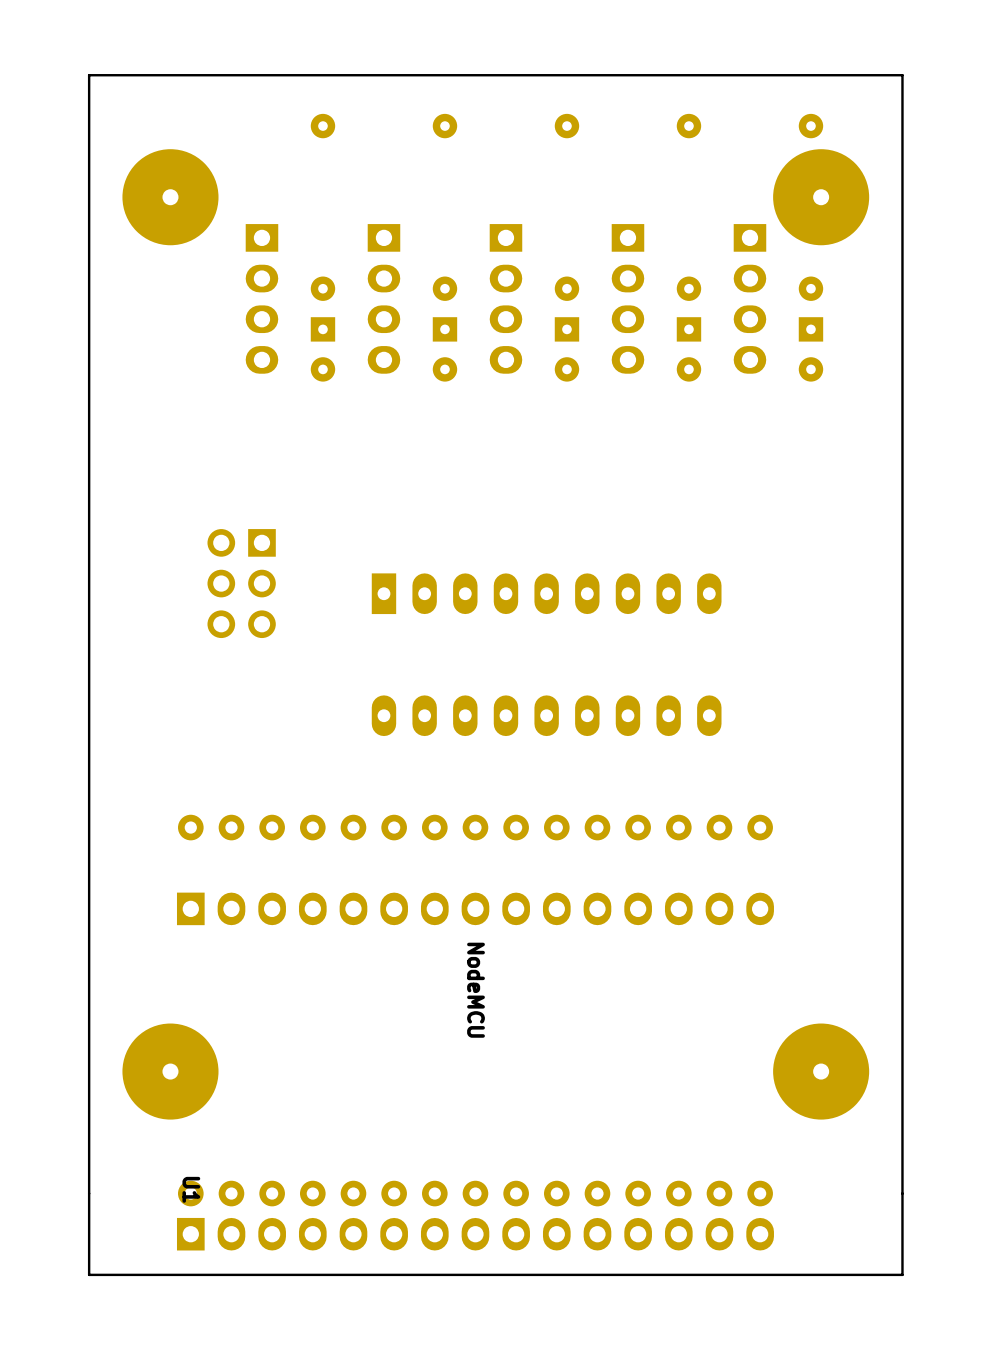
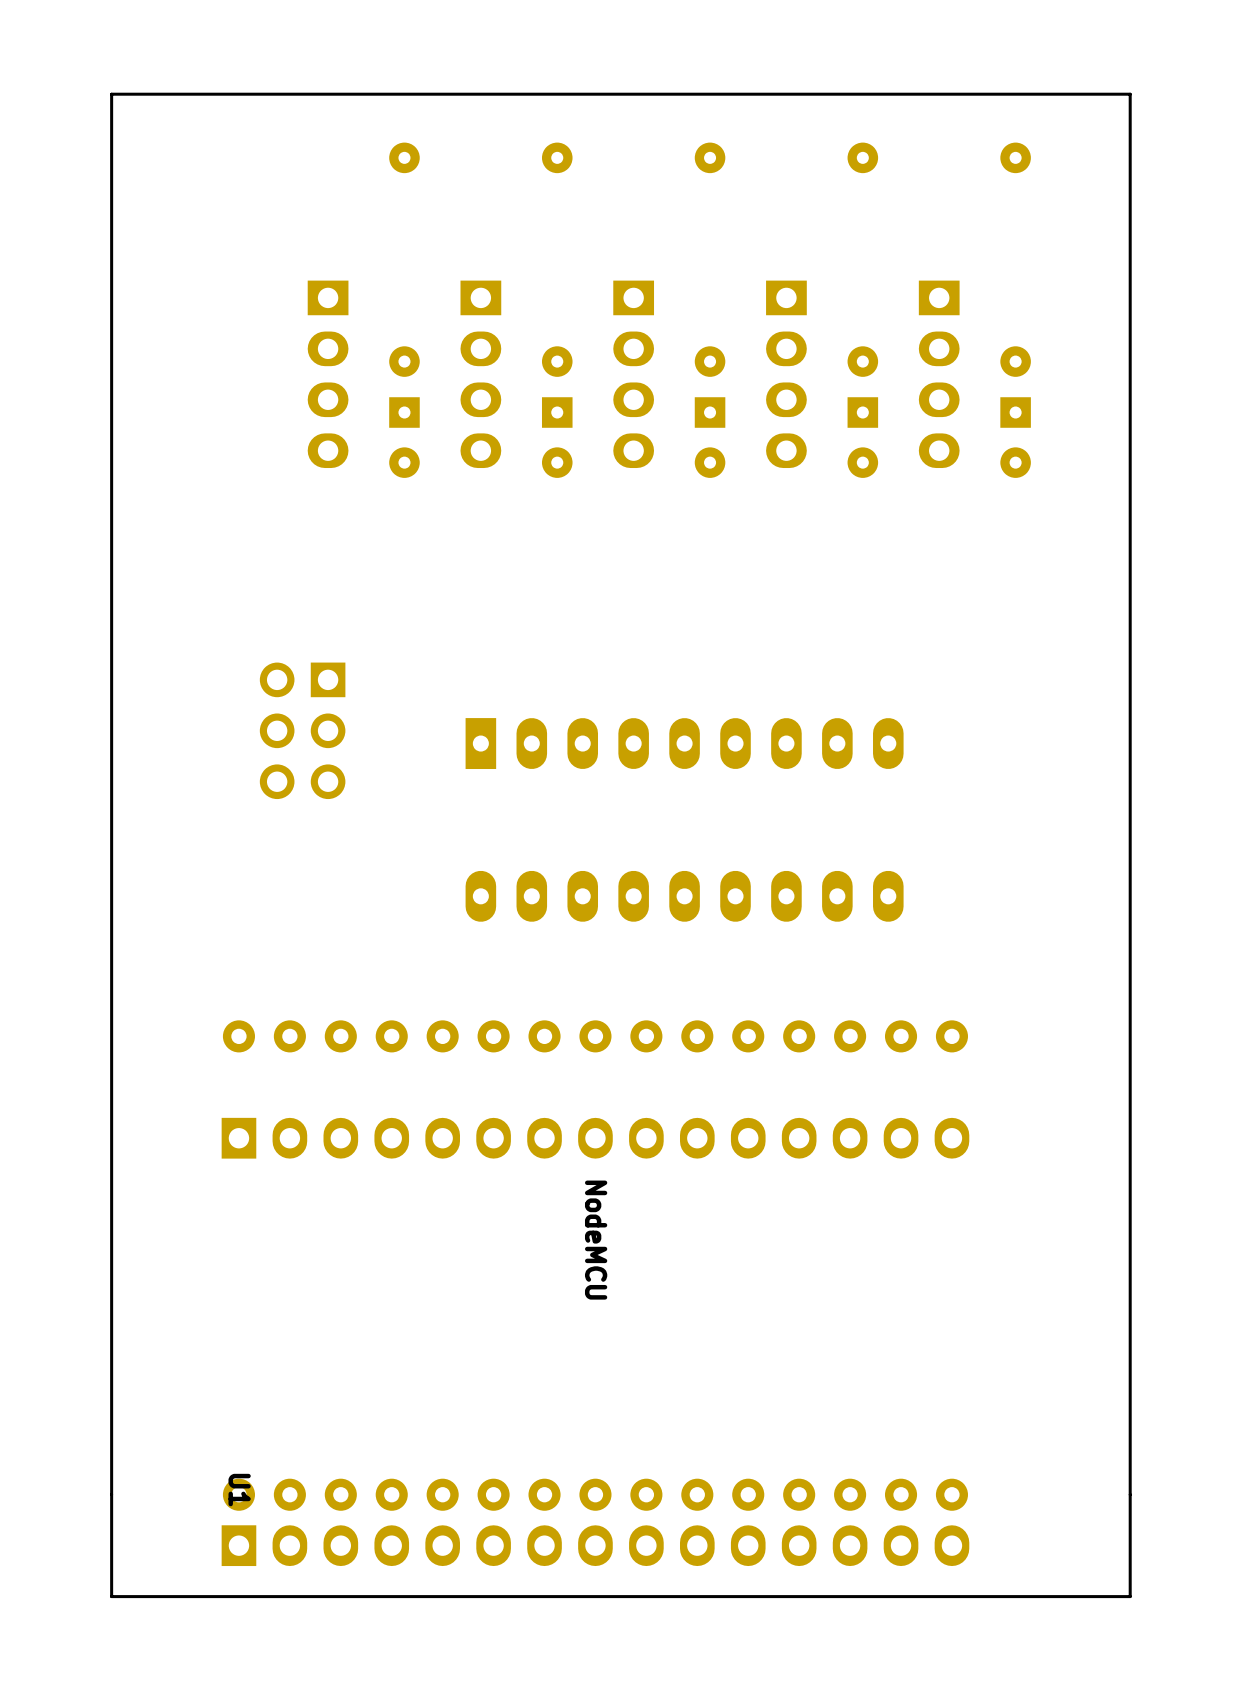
part: (170, 197) -> none
part: (821, 197) -> none
part: (170, 1071) -> none
part: (821, 1071) -> none

